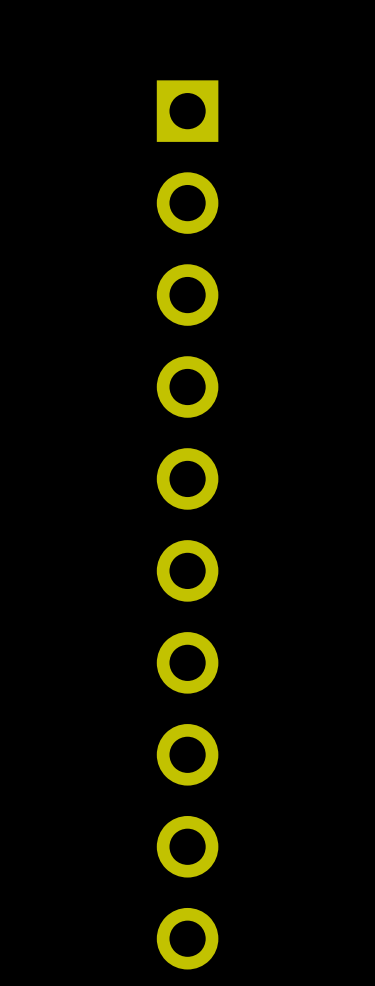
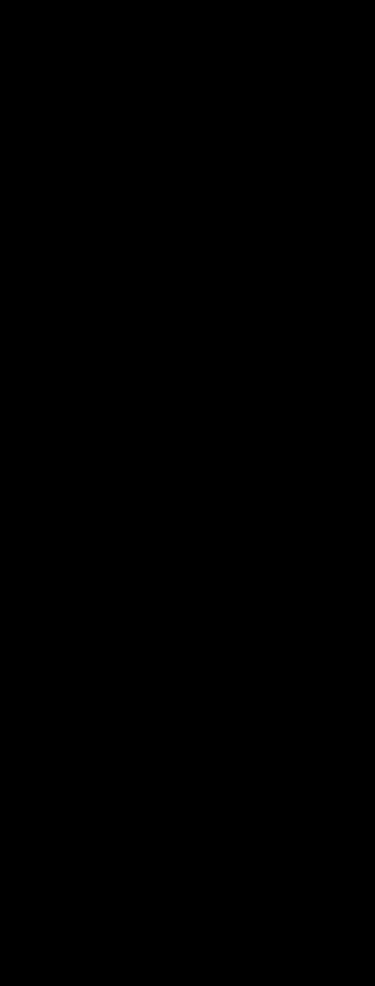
part: (187, 524) -> none

